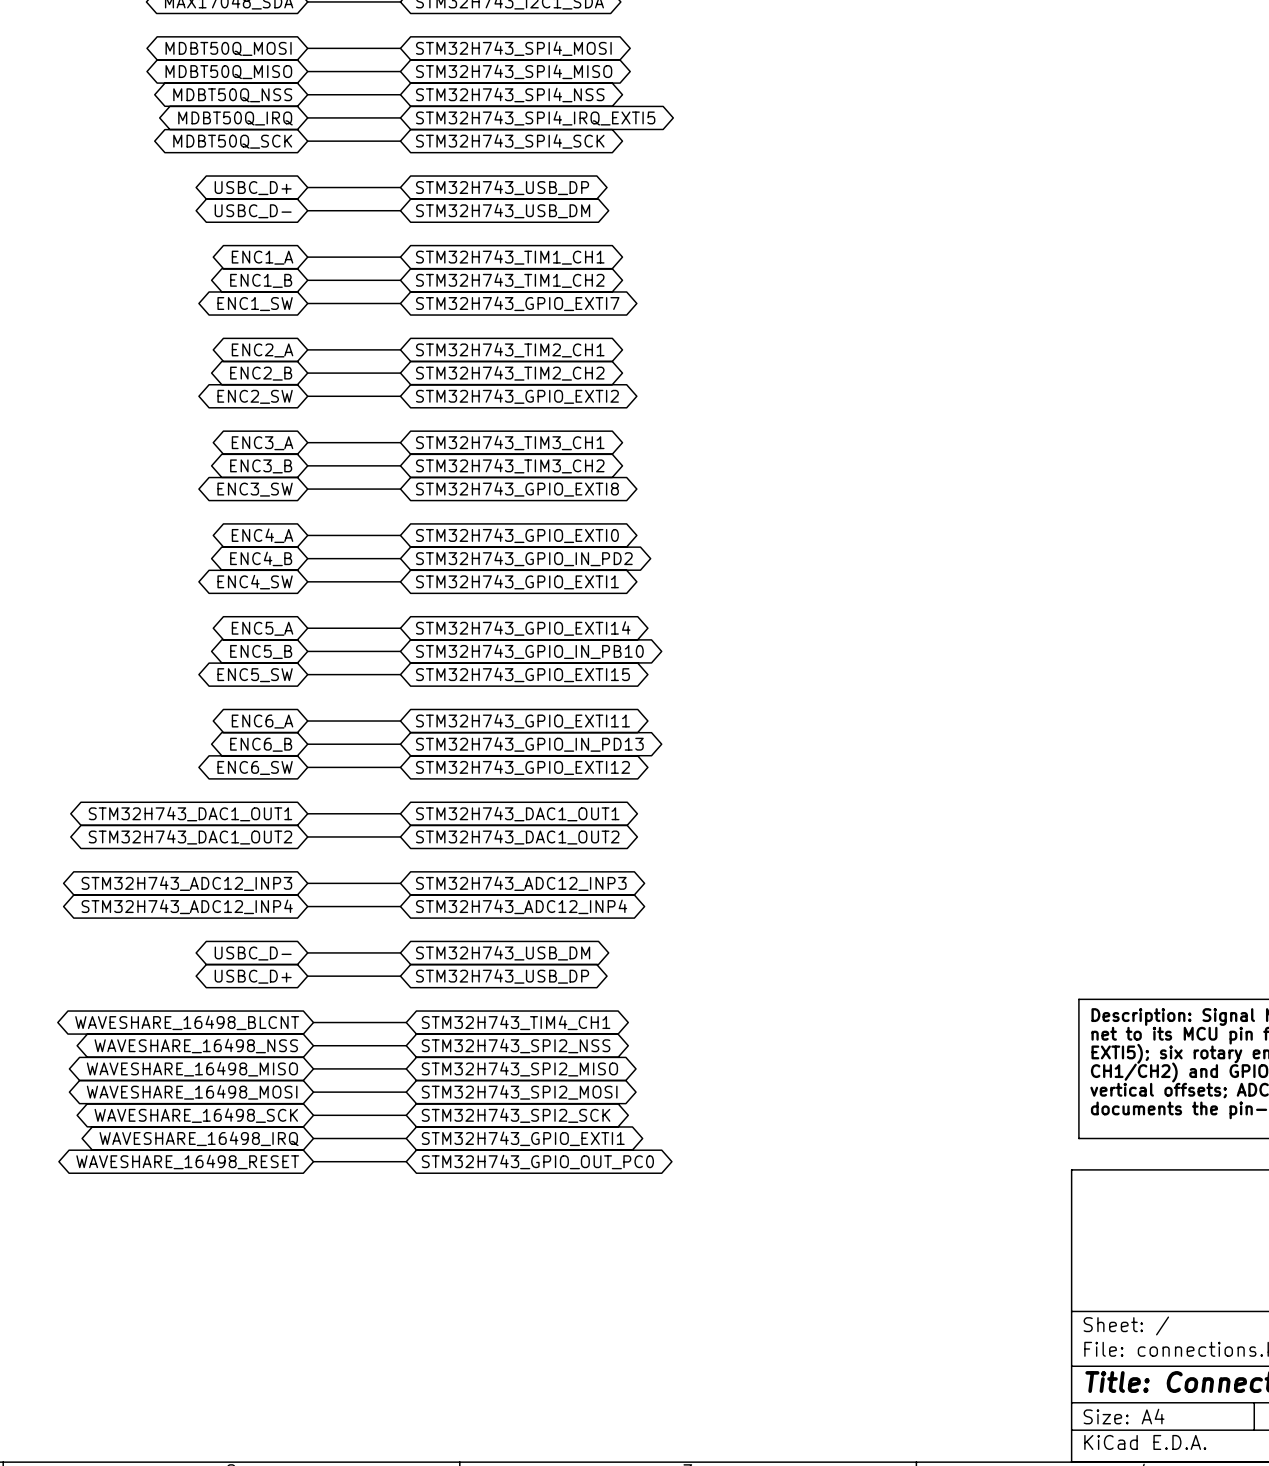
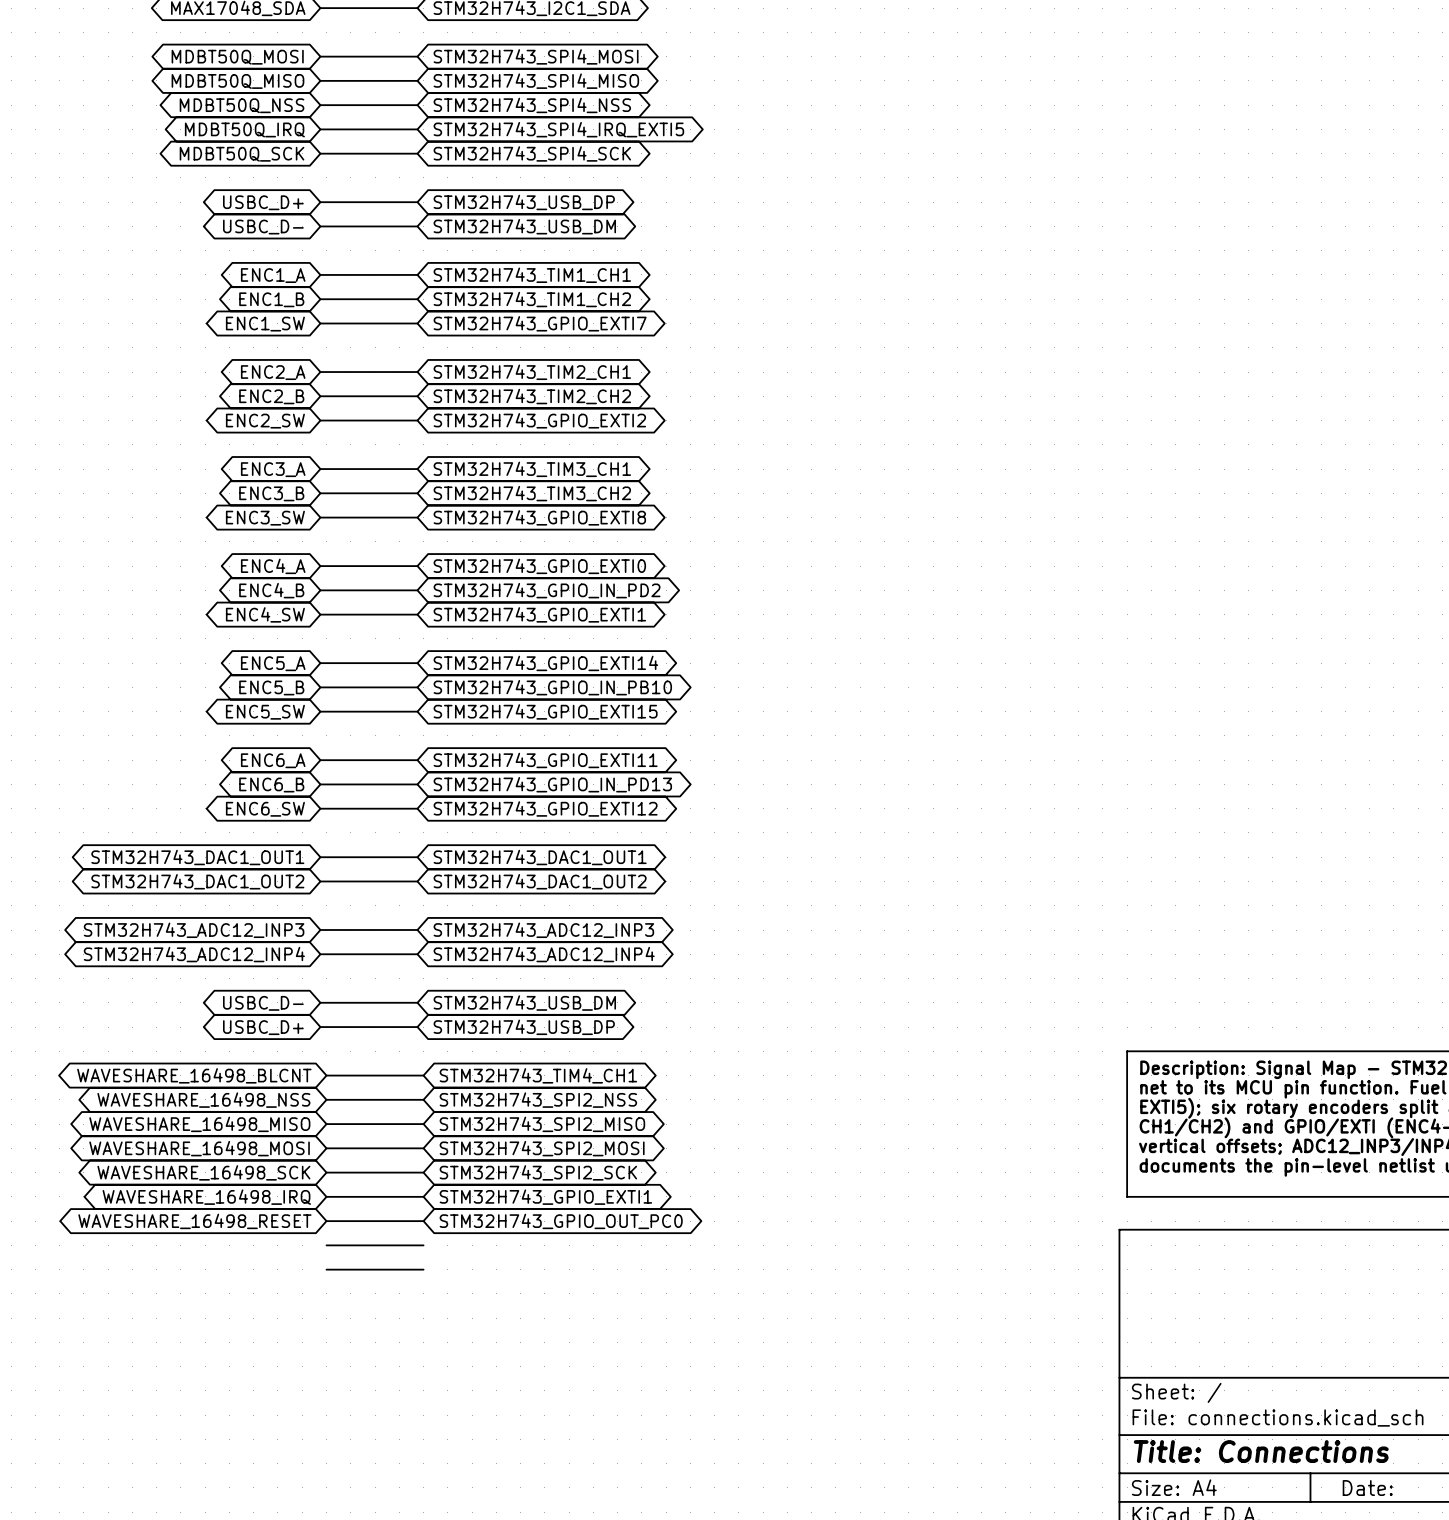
wire: none -> (326, 1245) (423, 1245)
wire: none -> (326, 1269) (423, 1269)

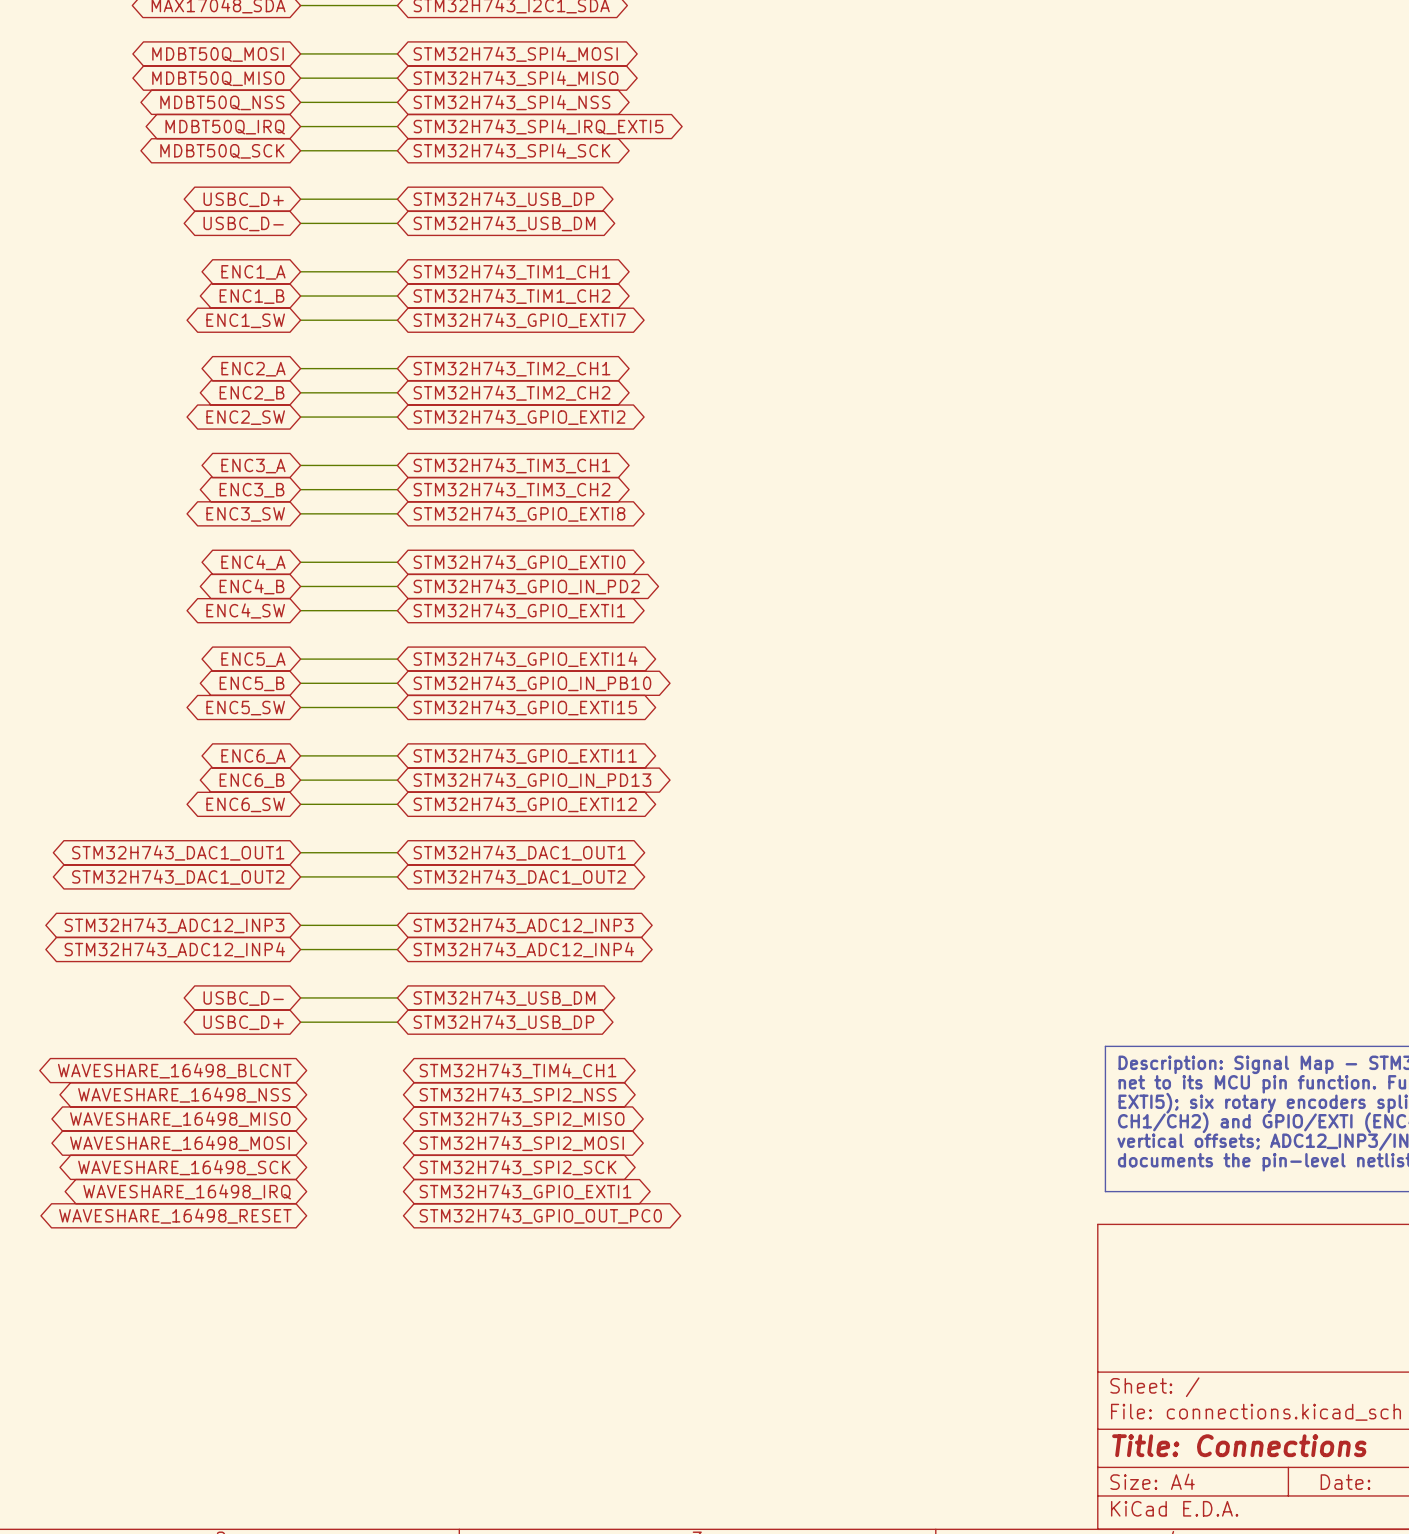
wire: (326, 1075) (423, 1075) -> none
wire: (326, 1099) (423, 1099) -> none
wire: (326, 1124) (423, 1124) -> none
wire: (326, 1148) (423, 1148) -> none
wire: (326, 1172) (423, 1172) -> none
wire: (326, 1196) (423, 1196) -> none
wire: (326, 1221) (423, 1221) -> none
wire: (326, 1245) (423, 1245) -> none
wire: (326, 1269) (423, 1269) -> none

